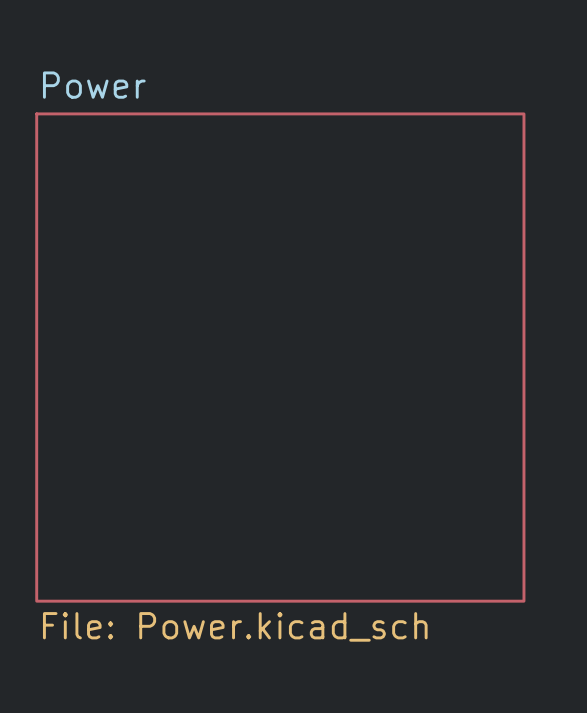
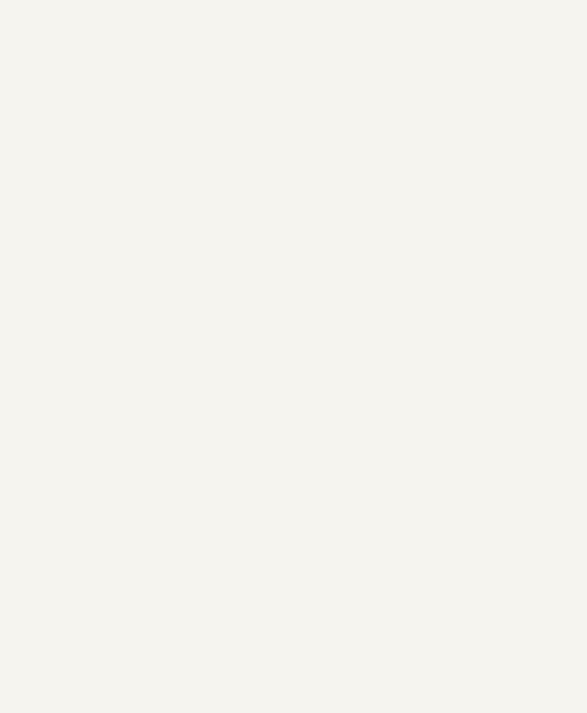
sheet Power: File: Power.kicad_sch (280, 357) -> none

